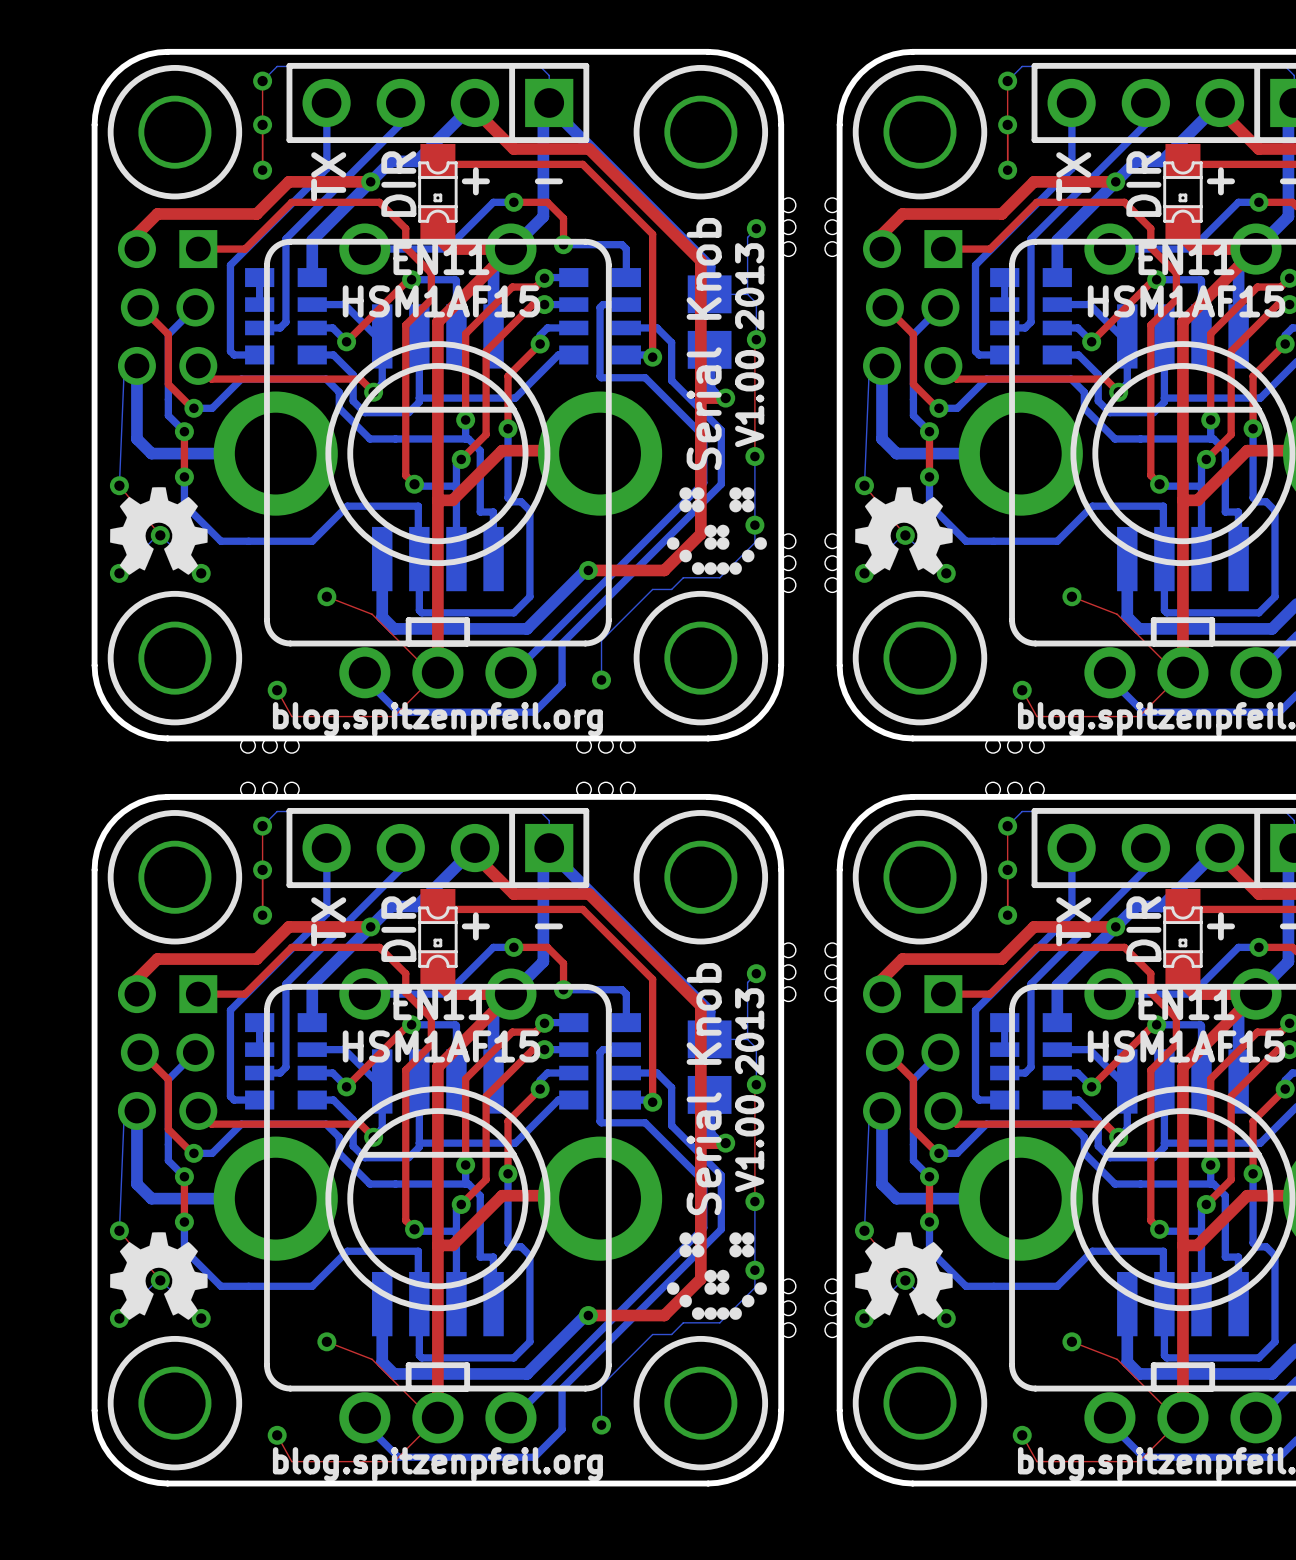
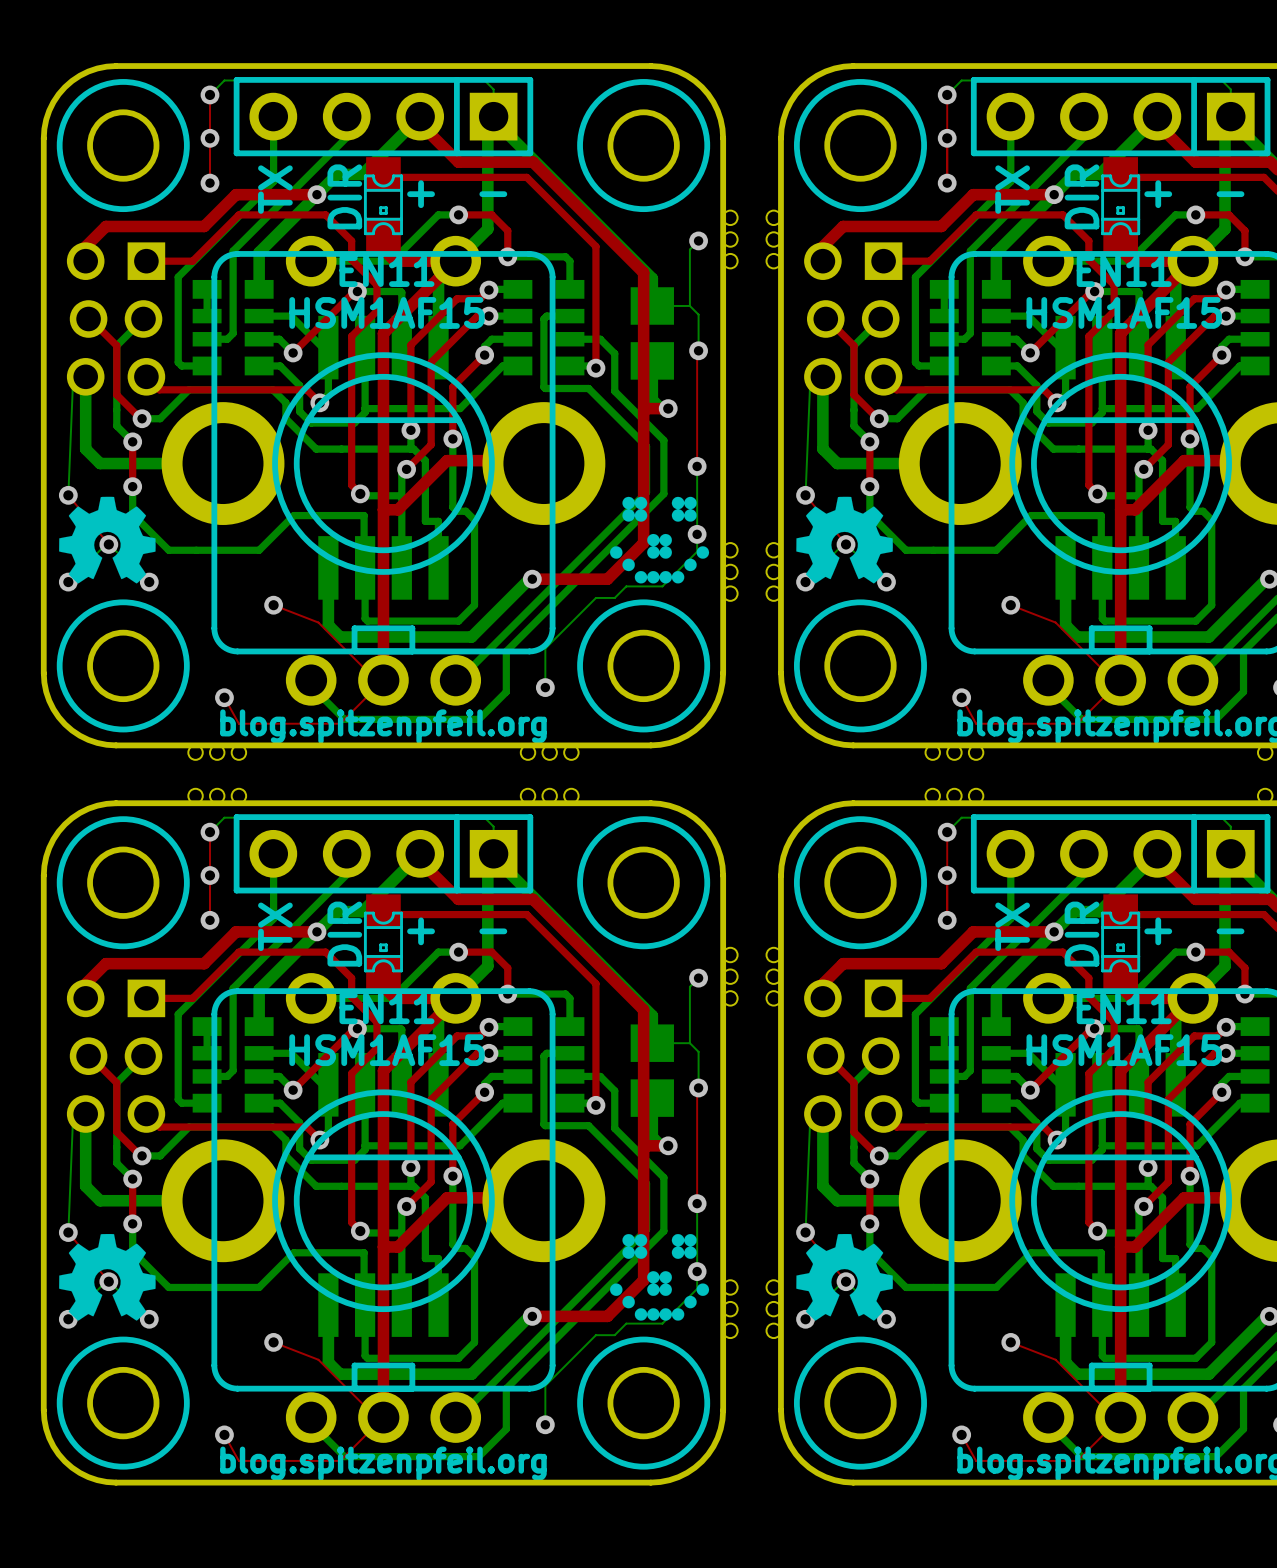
text: Serial Knob (704, 344) -> none
text: V1.00 2013 (749, 345) -> none
text: Serial Knob (704, 1089) -> none
text: V1.00 2013 (749, 1090) -> none

